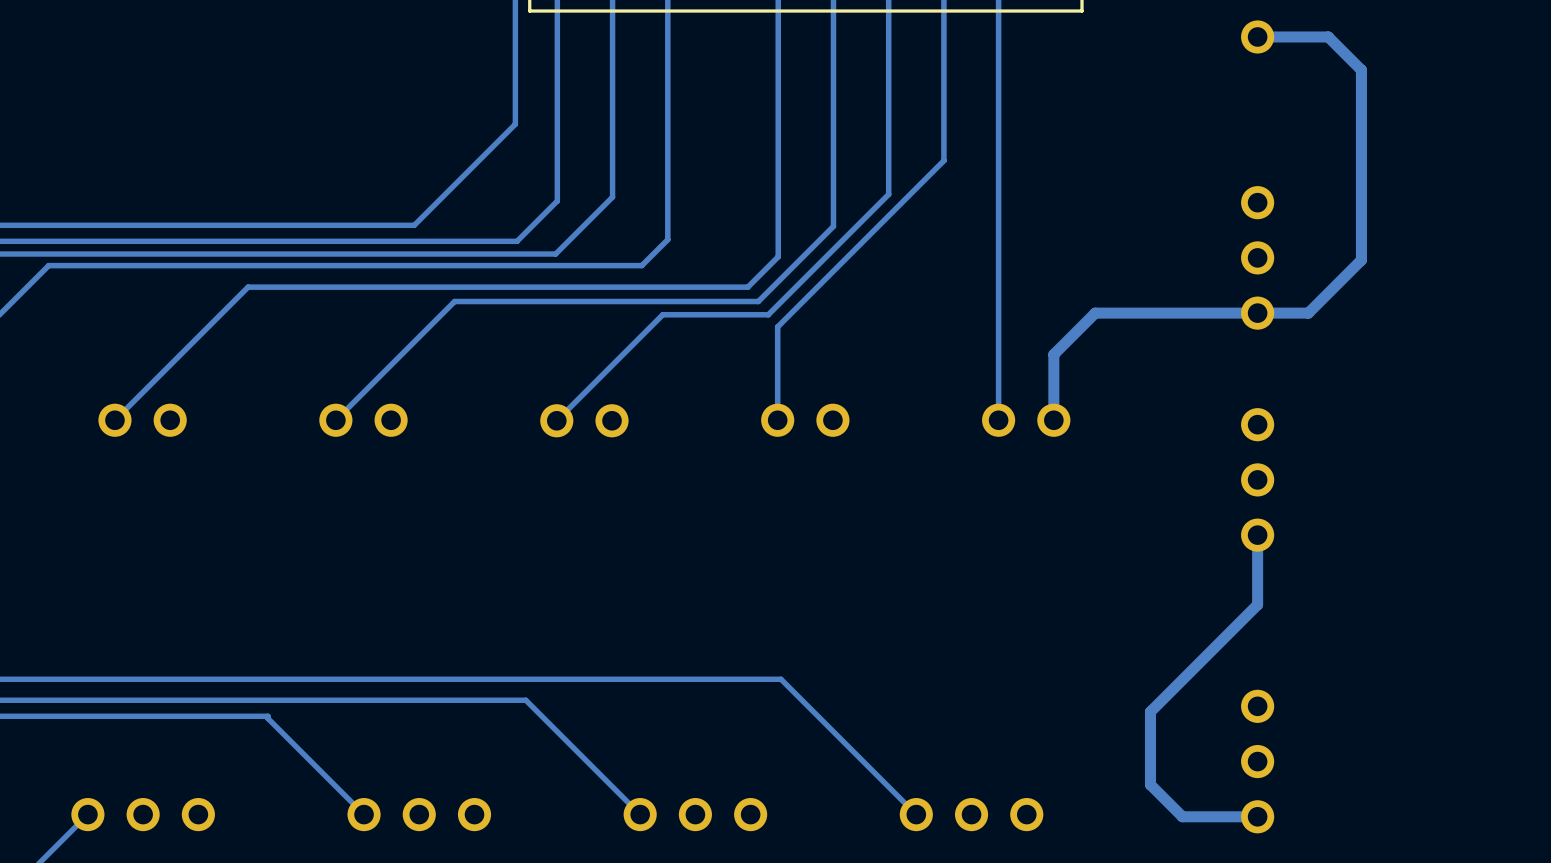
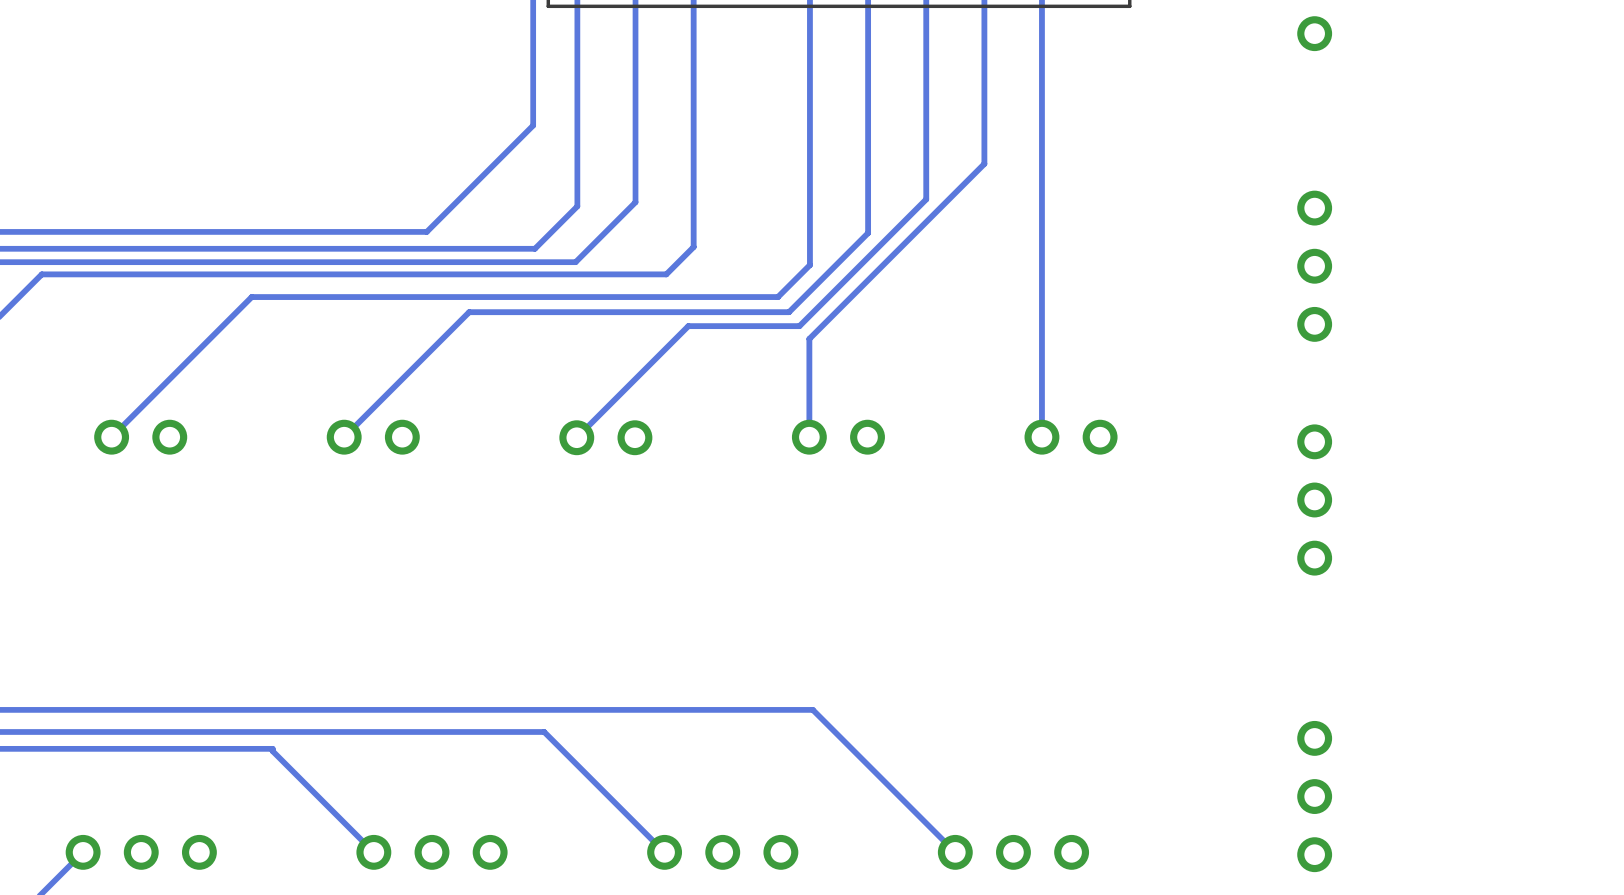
track: (1257, 36) (1328, 36) (1361, 70) (1361, 260) (1308, 313) (1095, 313) (1053, 354) (1053, 420) -> none
track: (1257, 535) (1257, 604) (1150, 711) (1150, 784) (1182, 816) (1257, 816) -> none

